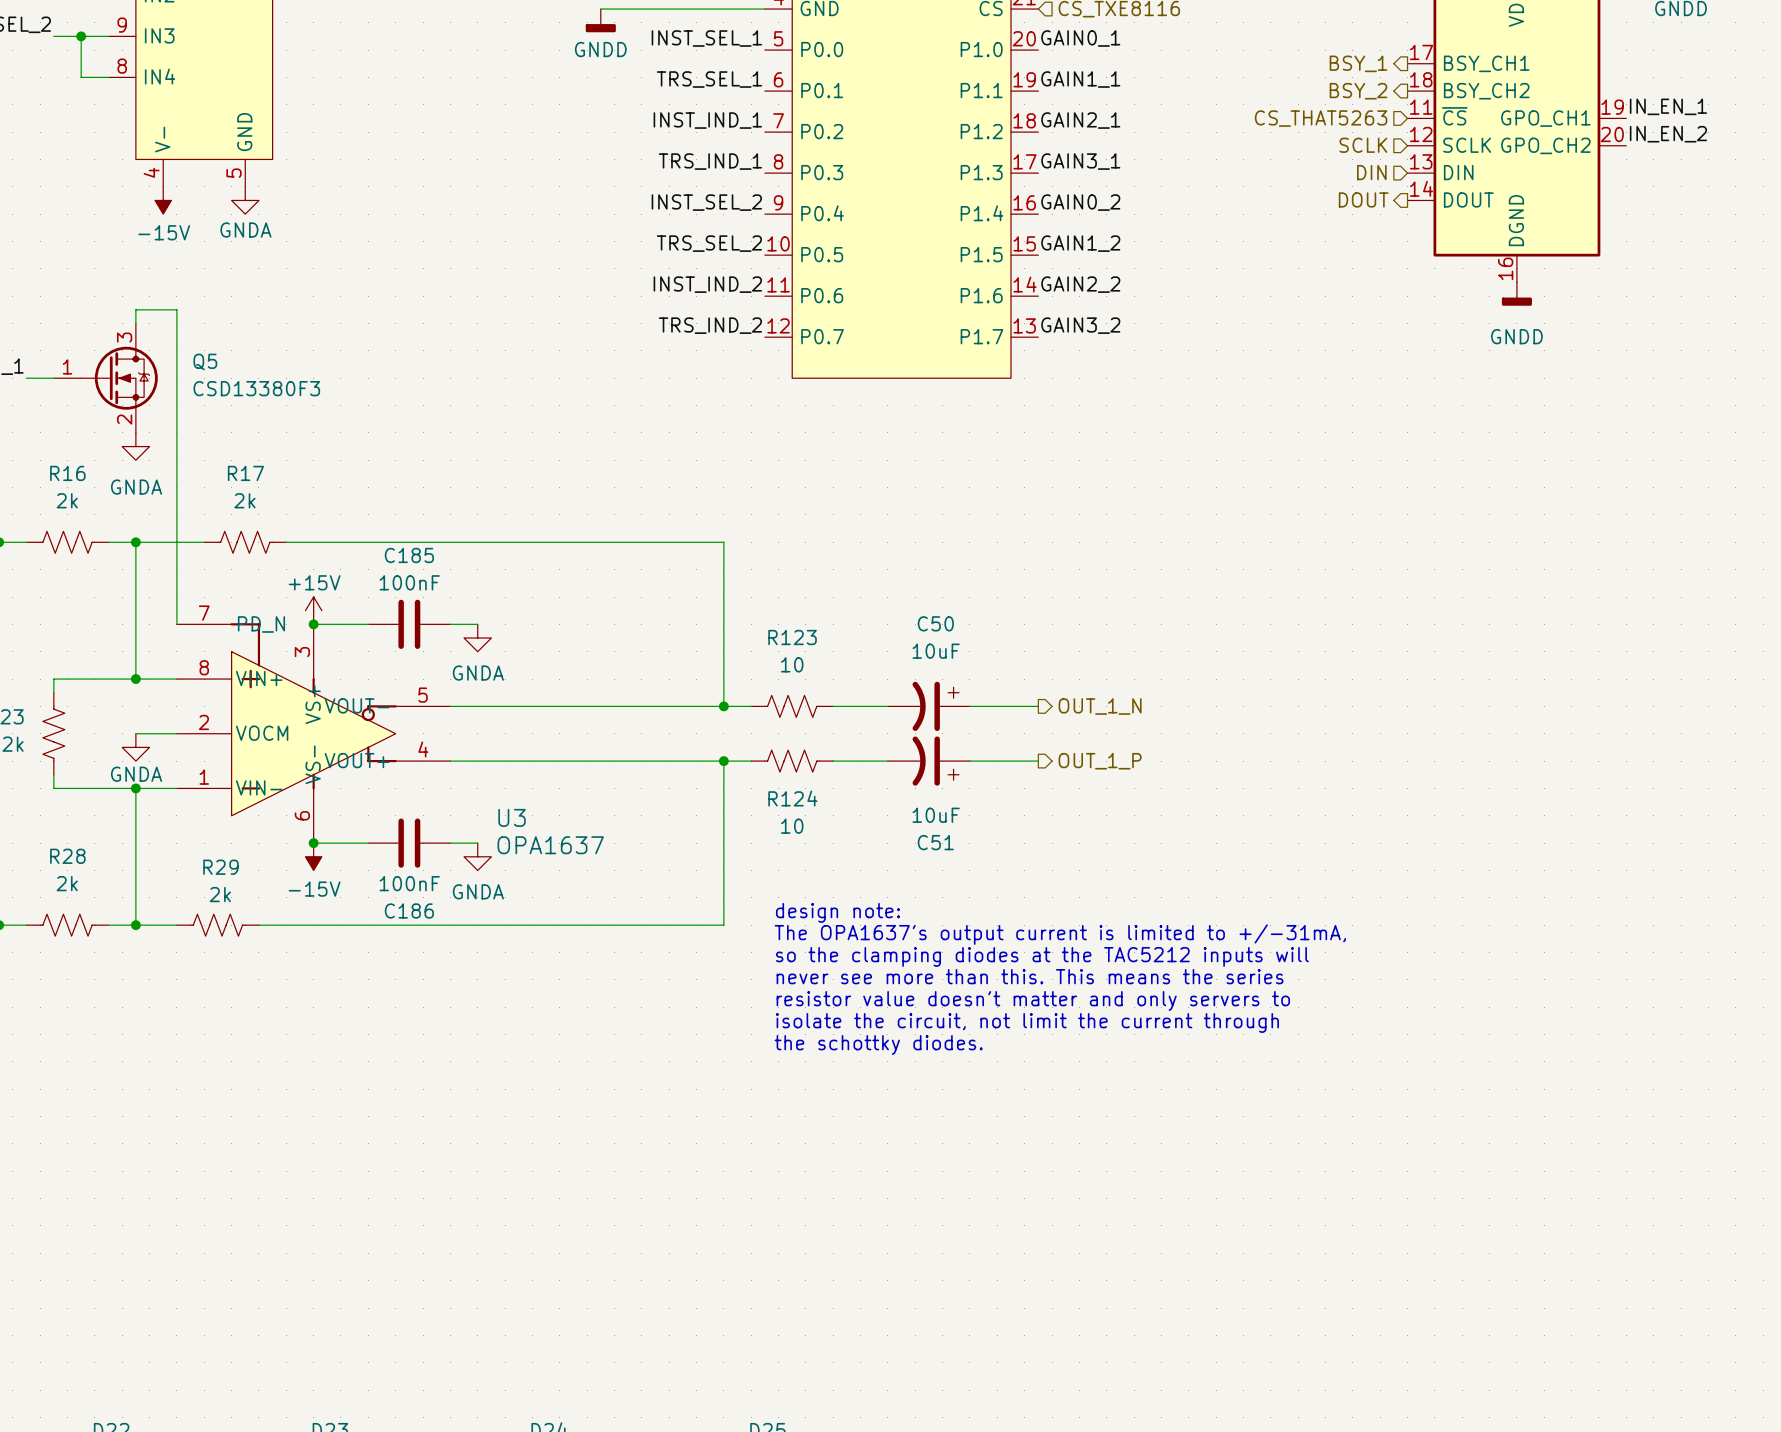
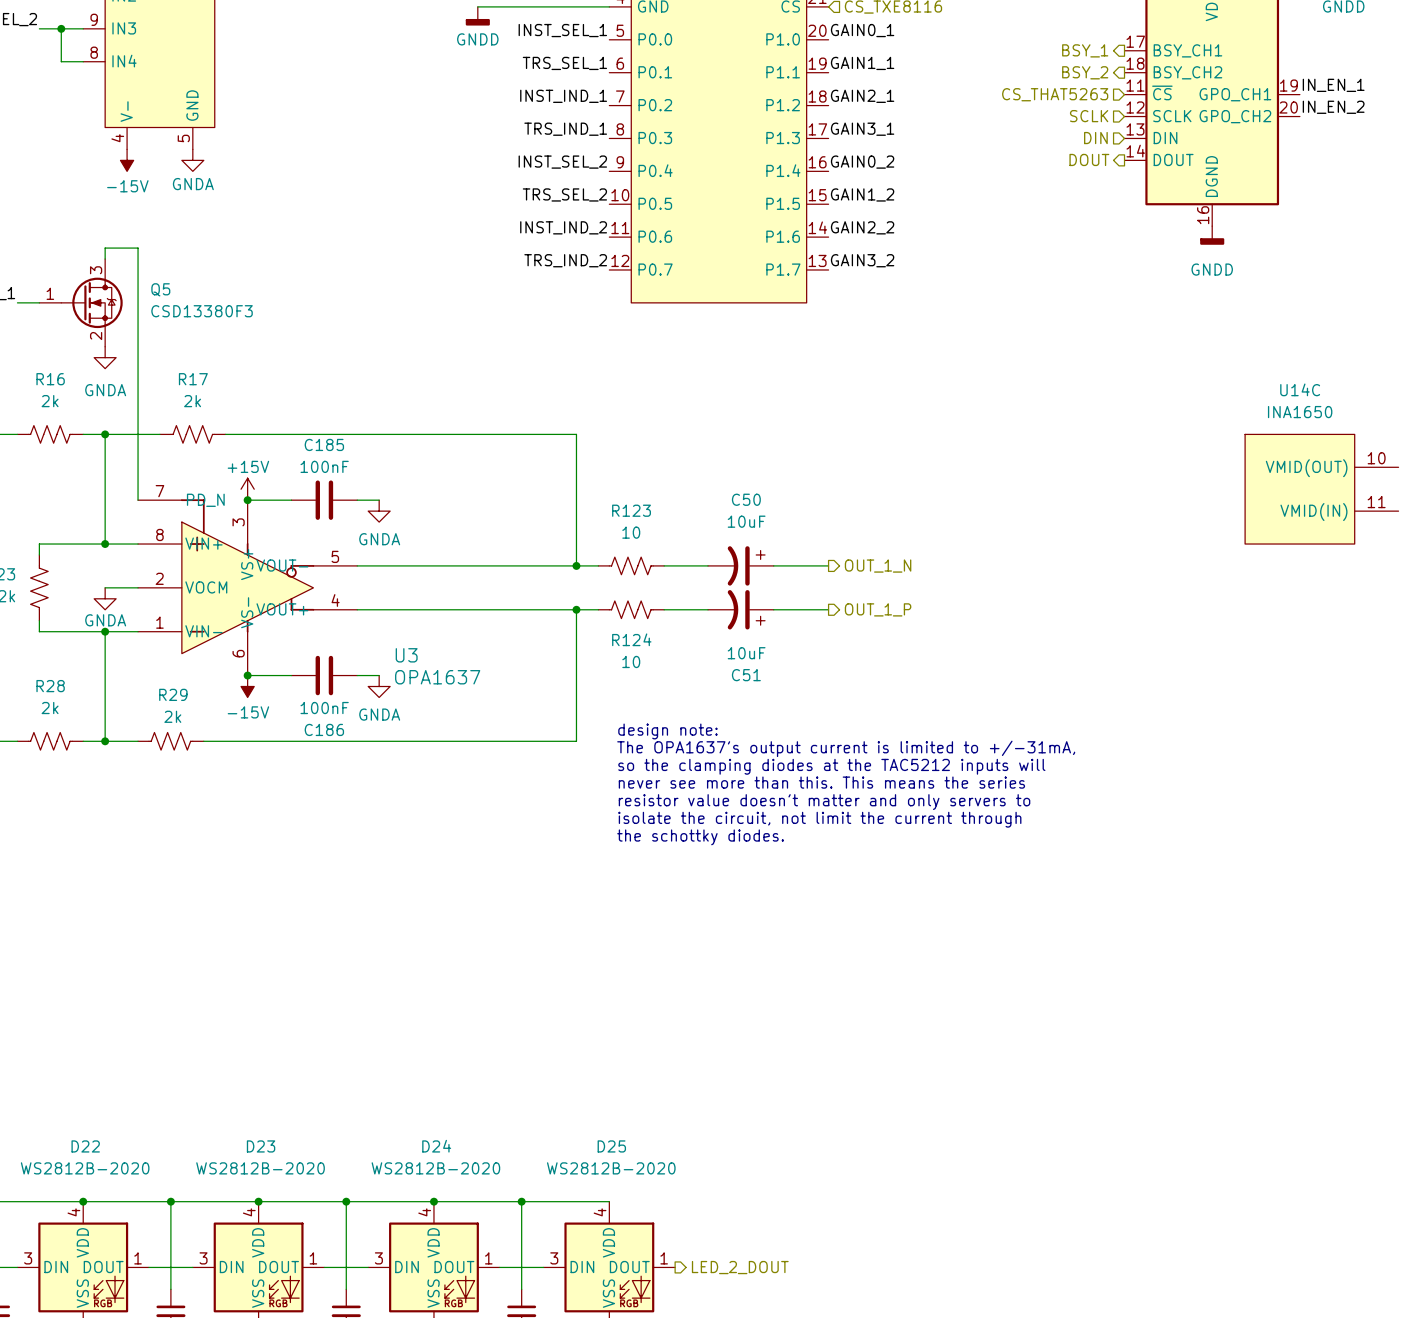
U14C: none -> INA1650 (1321, 489)

